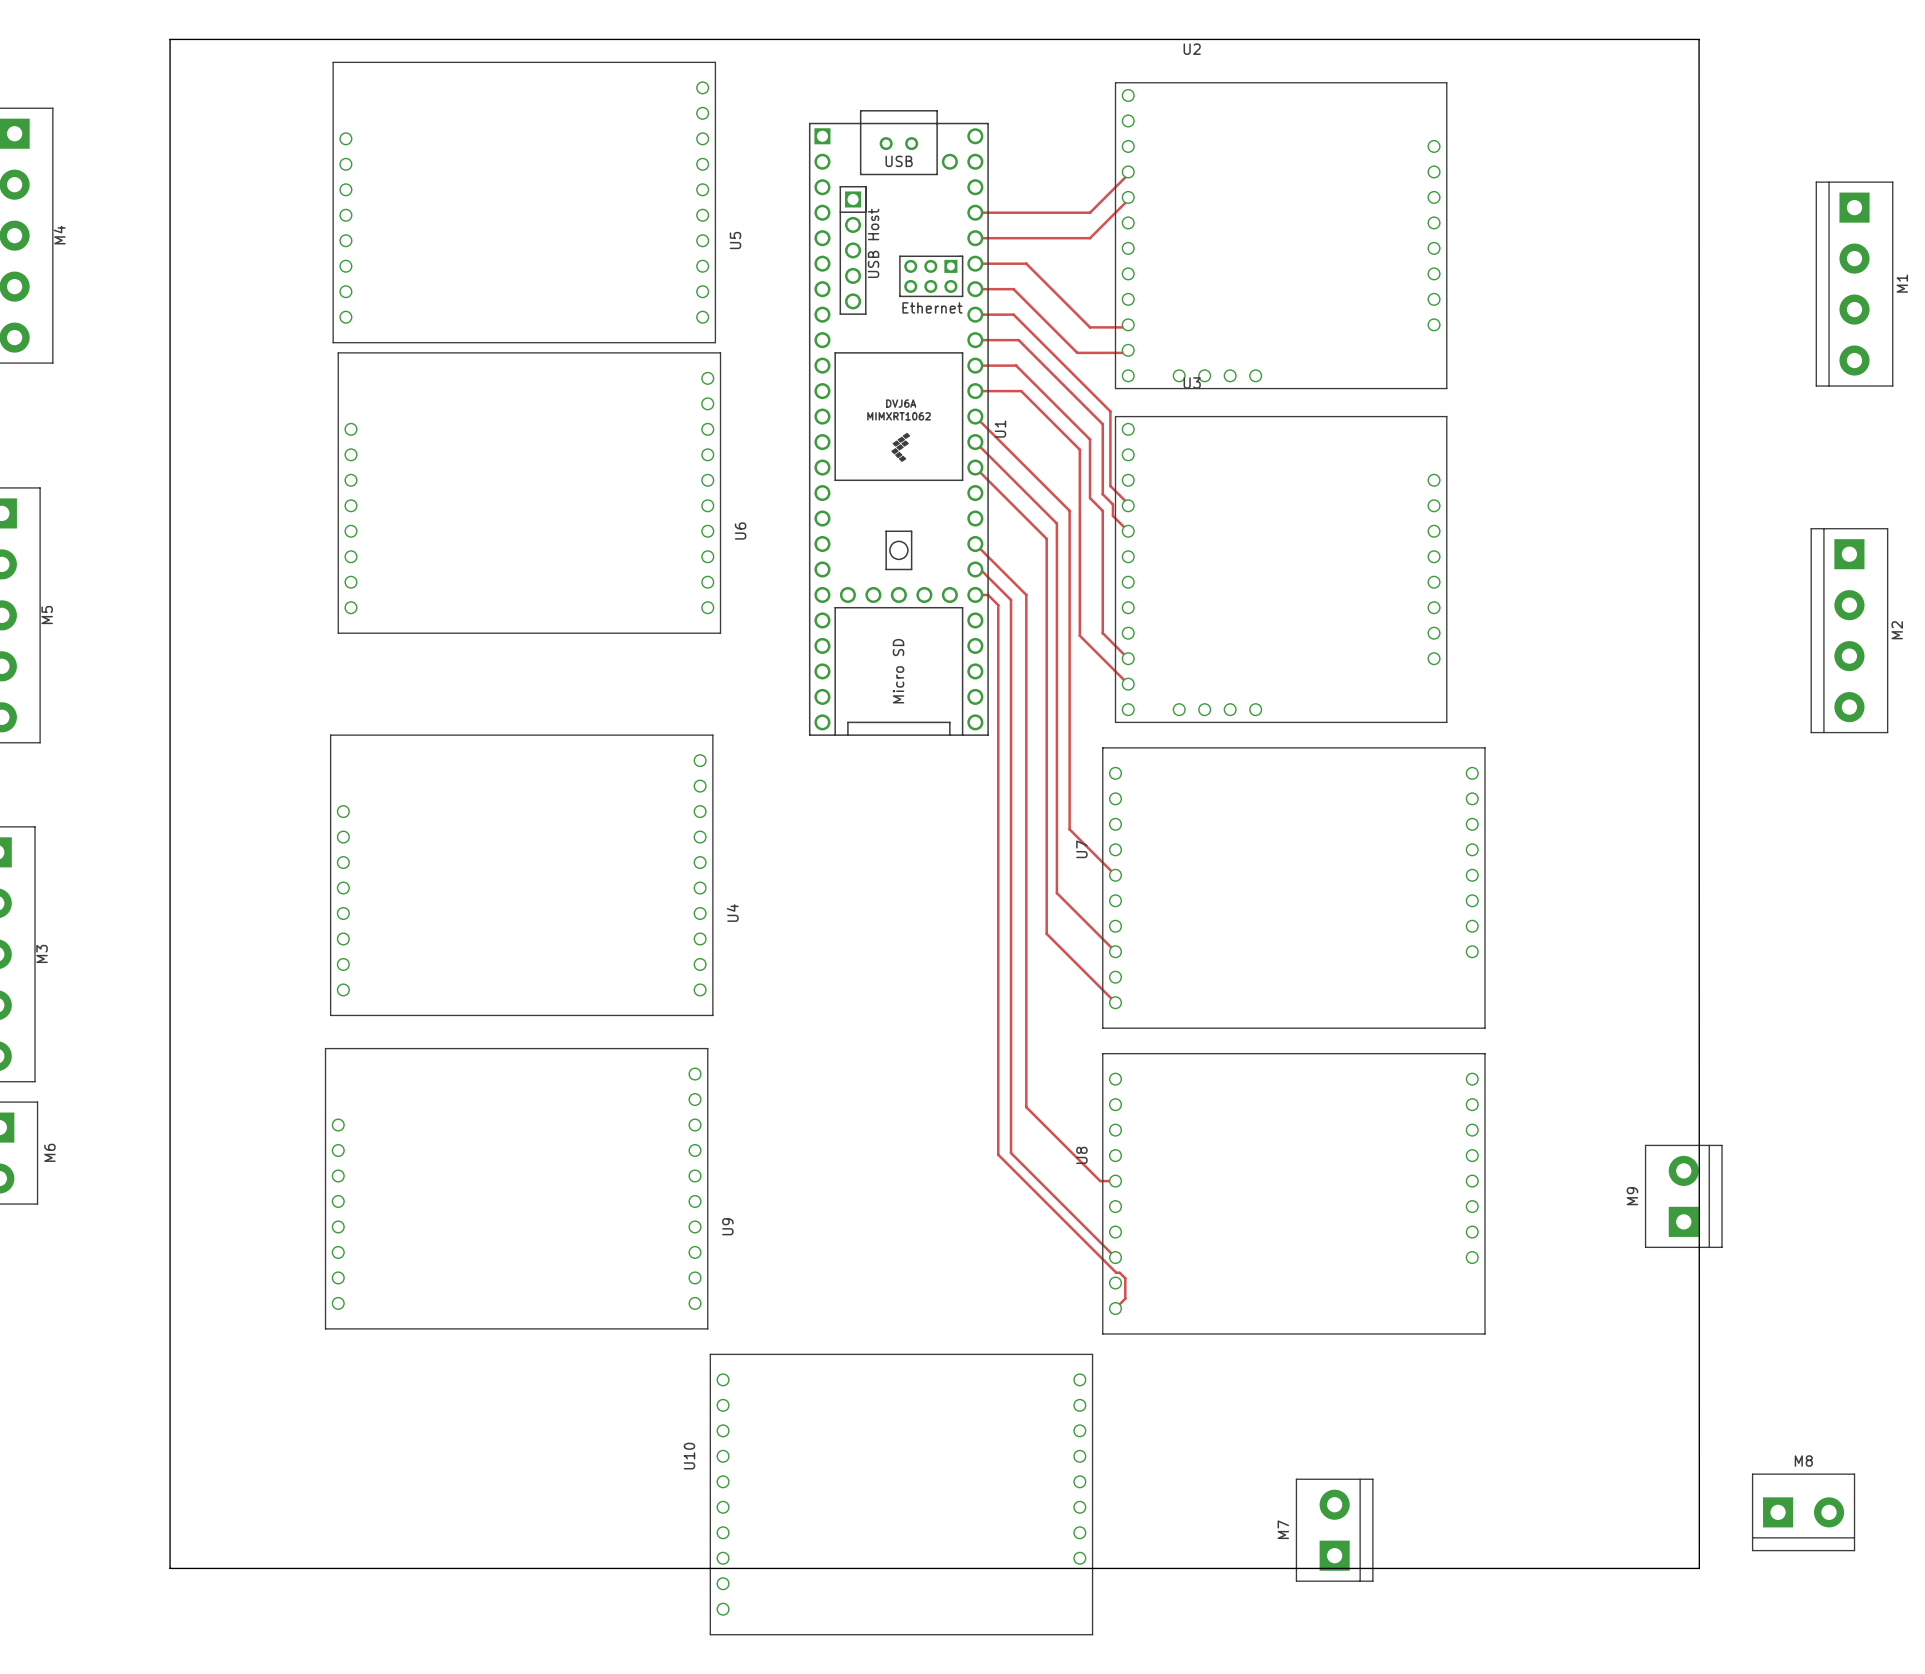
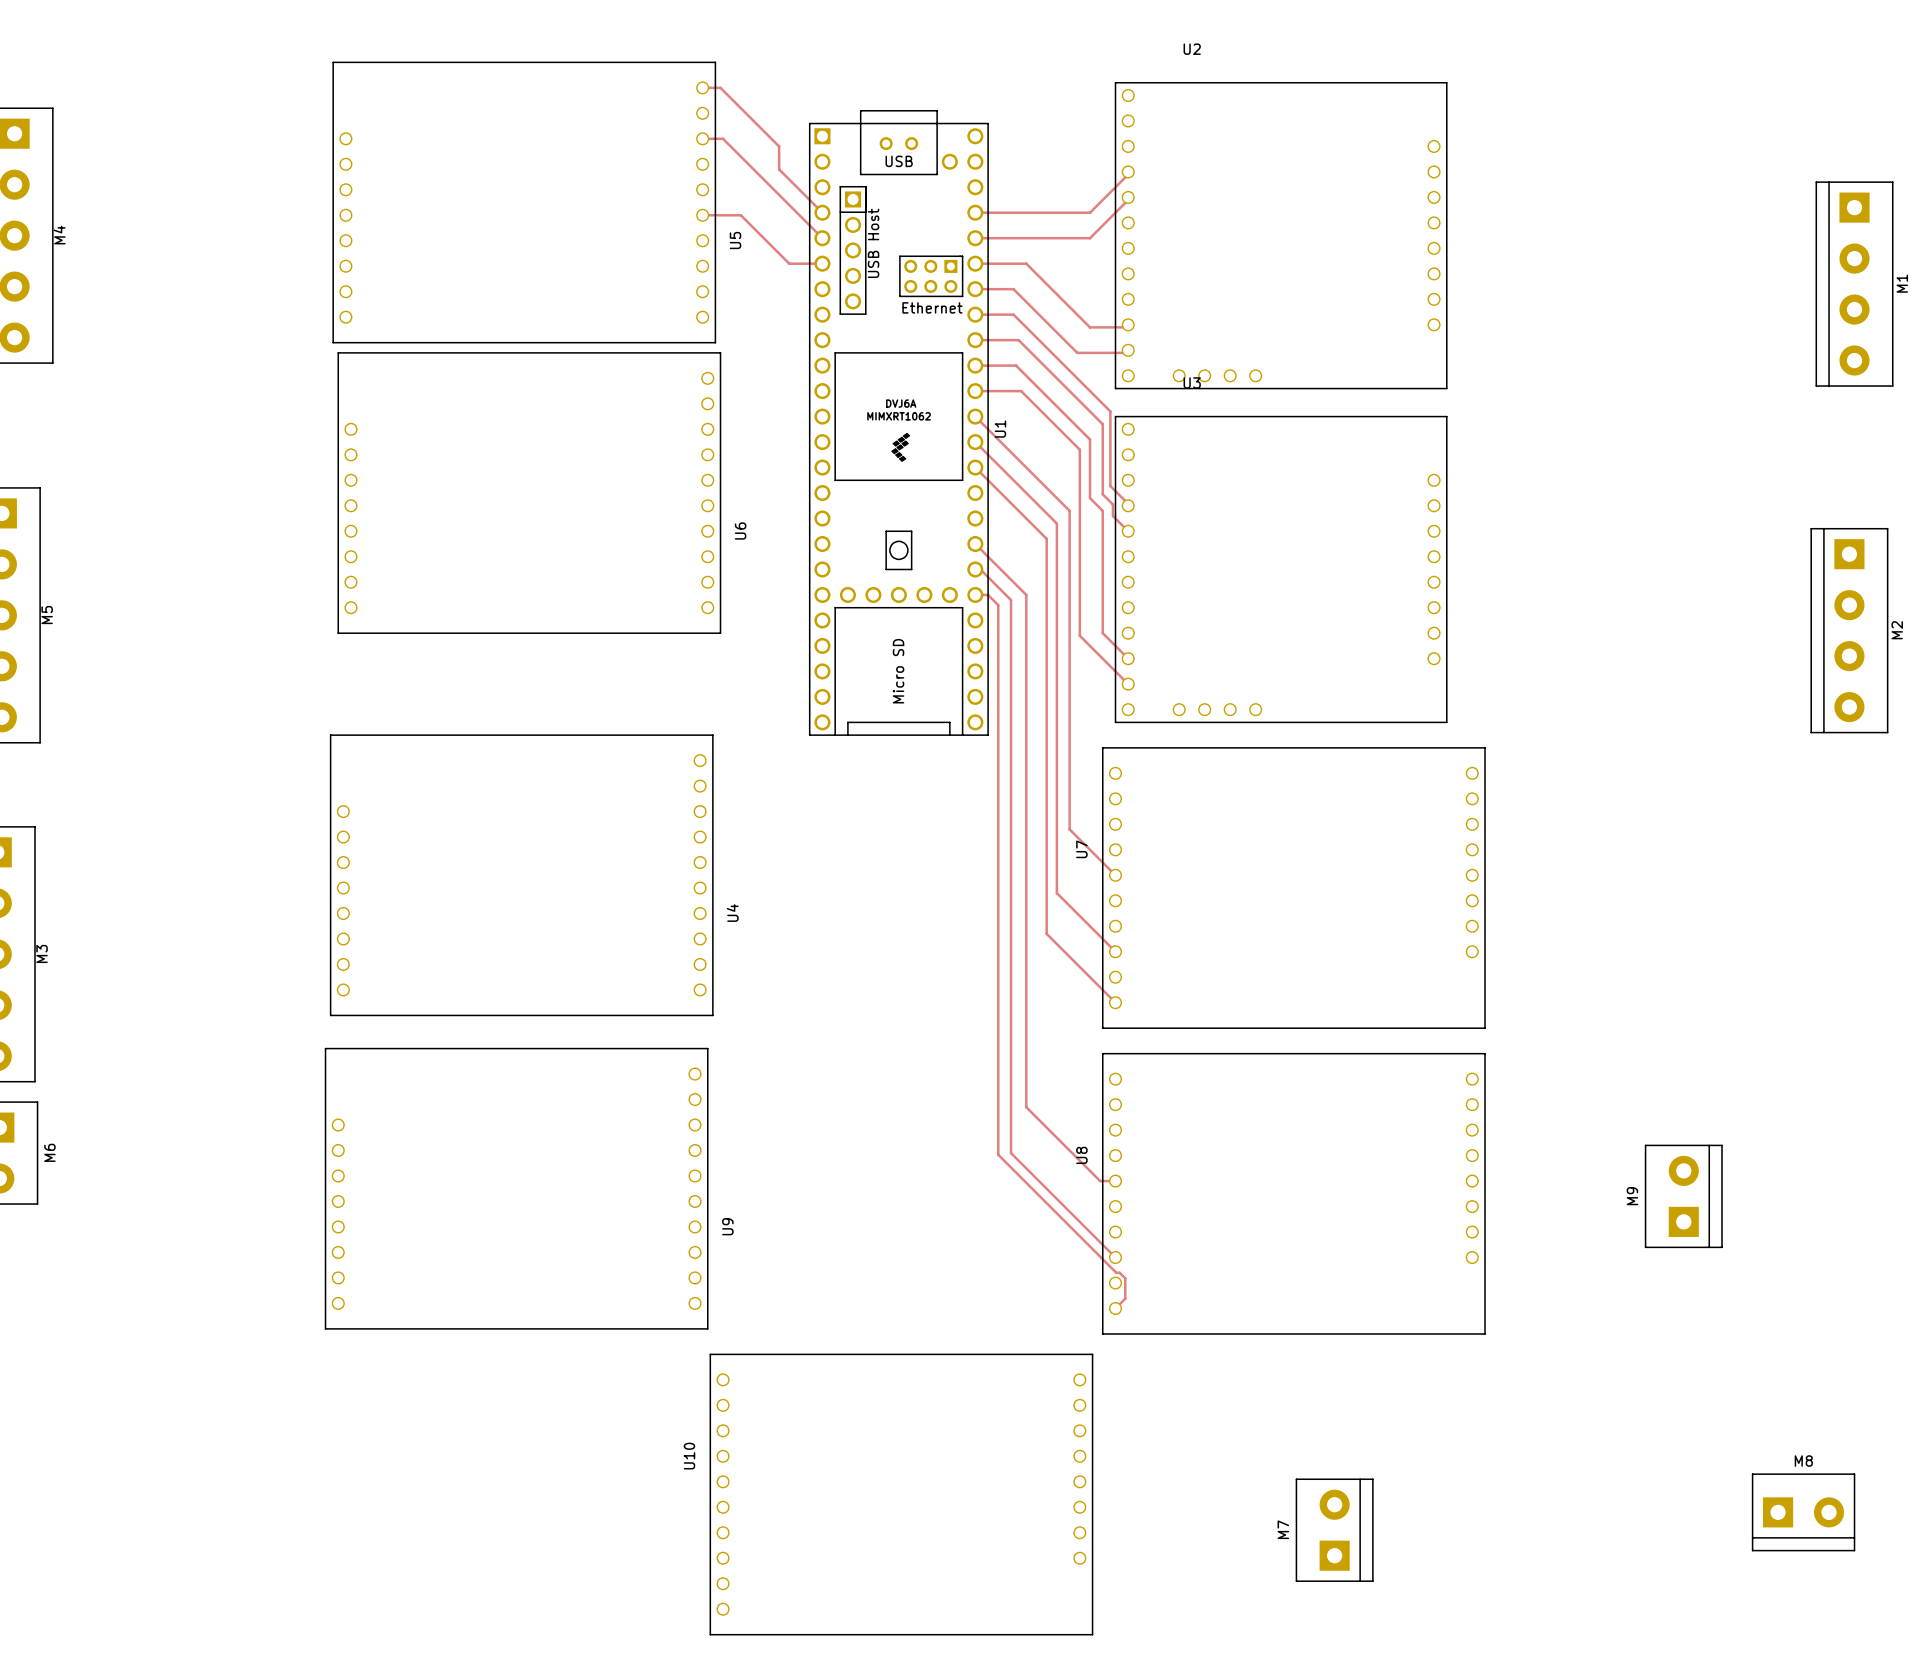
board edge: (170, 39) (170, 1568) (1699, 1568) (1699, 39) -> none
board edge: (170, 39) (1699, 39) -> none
top track: none -> (702, 87) (720, 87) (779, 146) (779, 169) (822, 212)
top track: none -> (702, 138) (723, 138) (822, 238)
top track: none -> (702, 215) (740, 215) (789, 263) (822, 263)

